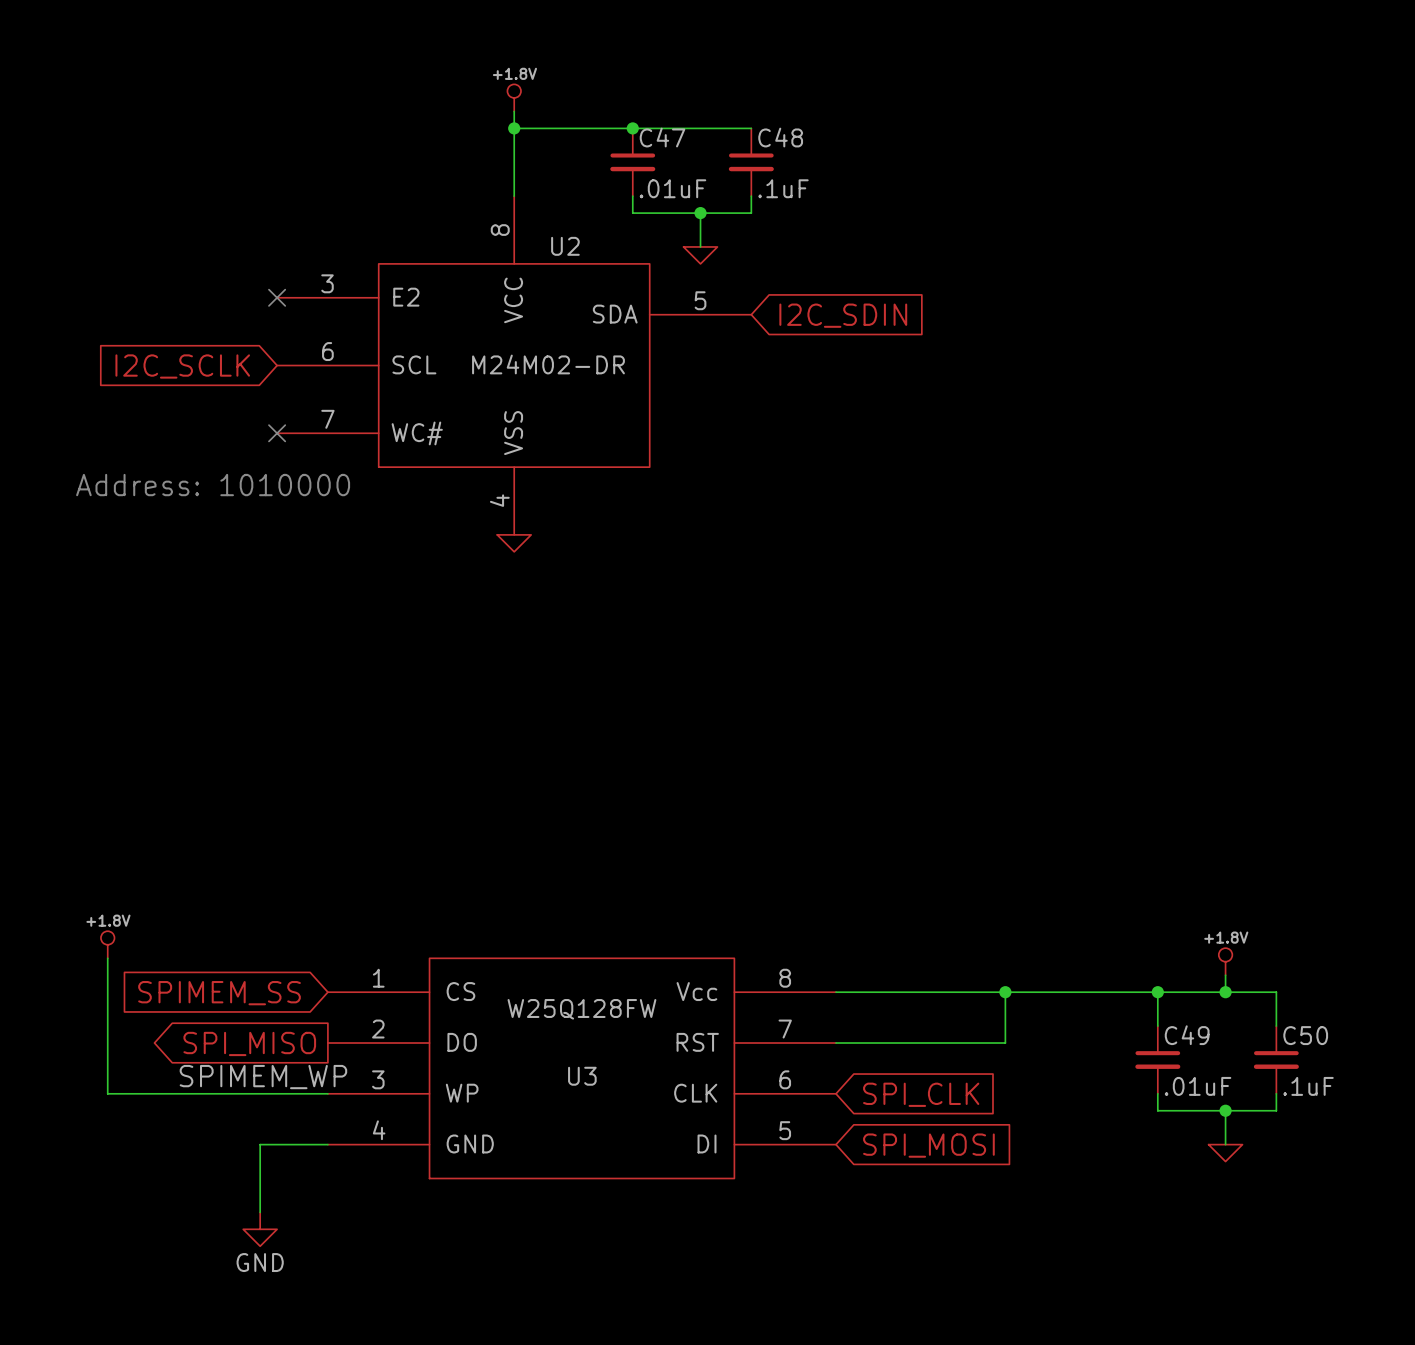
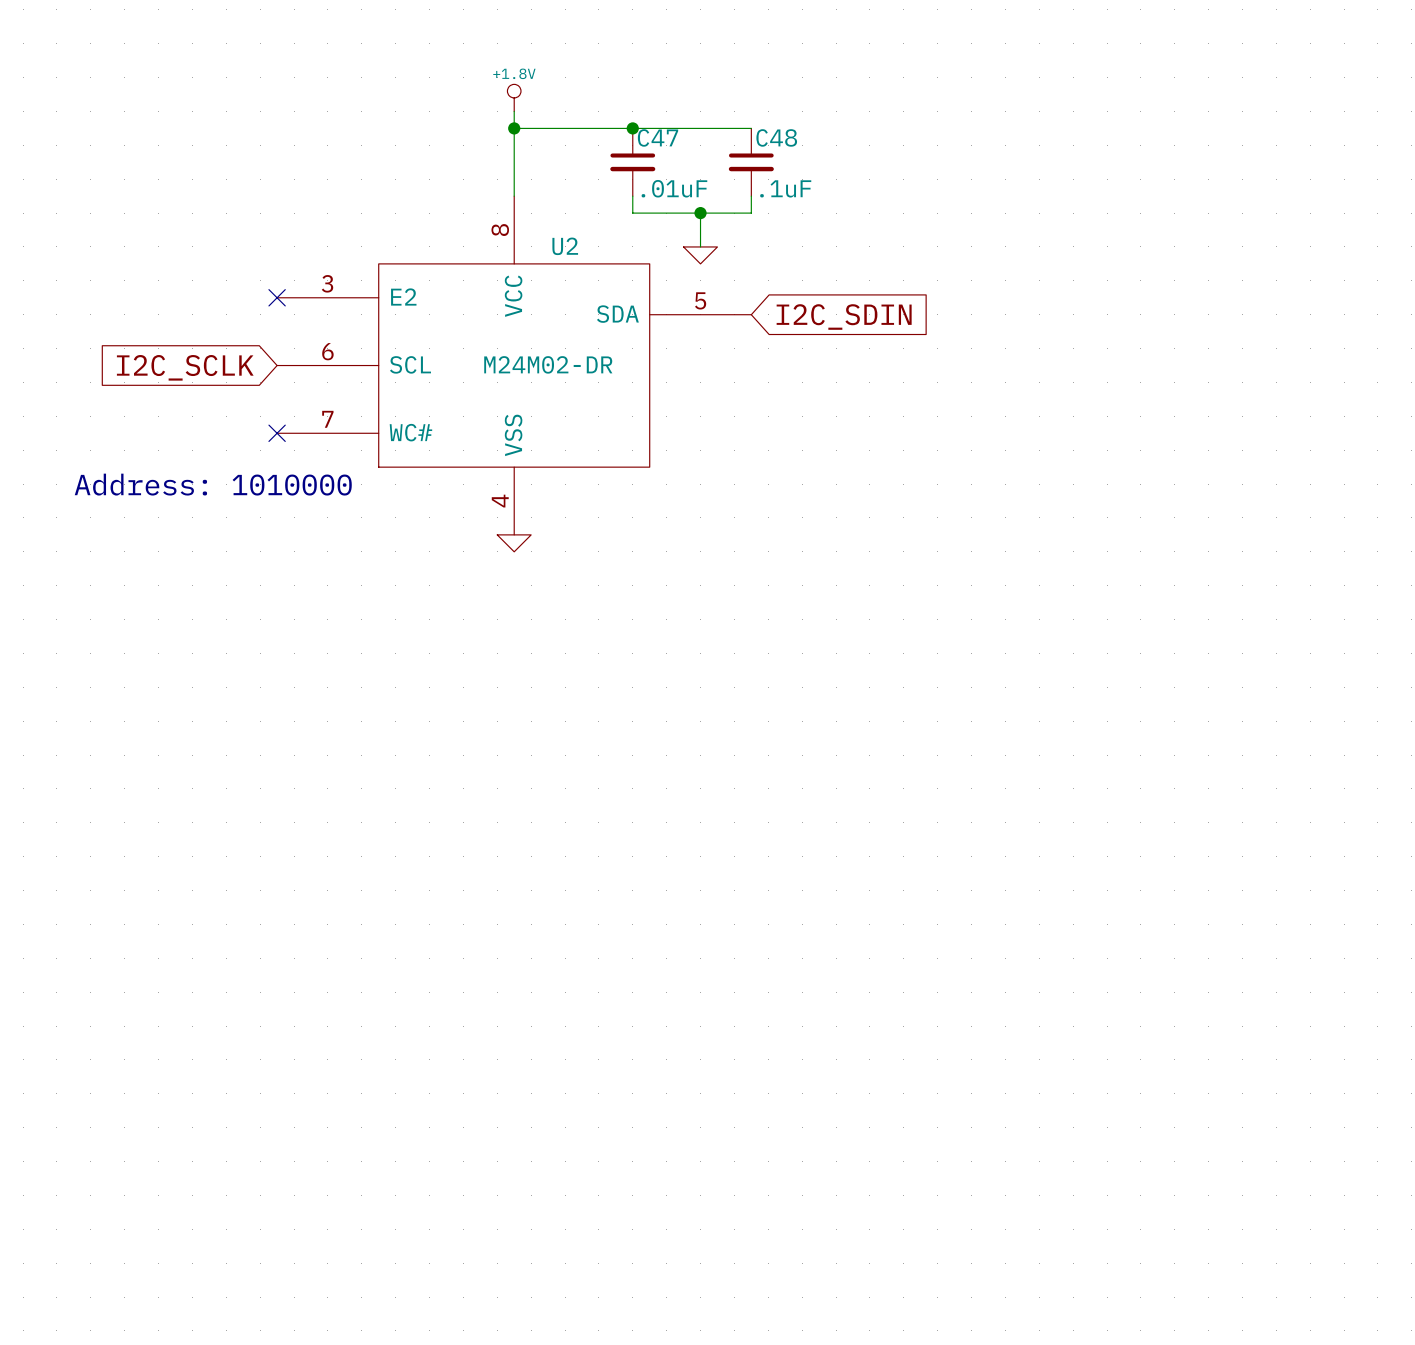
power symbol: +1.8V (107, 944) -> none
wire: (107, 958) (107, 1093) (327, 1093) -> none
power symbol: +1.8V (1225, 961) -> none
wire: (1225, 975) (1225, 992) -> none
wire: (836, 992) (1276, 992) (1276, 1026) -> none
wire: (1005, 992) (1005, 1043) (836, 1043) -> none
junction: (1005, 992) -> none
wire: (1157, 992) (1157, 1026) -> none
junction: (1157, 992) -> none
junction: (1225, 992) -> none
global label: SPIMEM_SS (219, 993) -> none
global label: SPI_MISO (249, 1043) -> none
C49: .01uF (1157, 1059) -> none
C50: .1uF (1276, 1059) -> none
U3: W25Q128FW (581, 1068) -> none
label: SPIMEM_WP (263, 1077) -> none
wire: (1157, 1093) (1157, 1110) (1276, 1110) (1276, 1093) -> none
global label: SPI_CLK (921, 1094) -> none
wire: (1225, 1110) (1225, 1144) -> none
junction: (1225, 1110) -> none
wire: (327, 1144) (260, 1144) (260, 1212) -> none
global label: SPI_MOSI (928, 1145) -> none
power symbol: (1225, 1153) -> none
power symbol: GND (260, 1229) -> none

